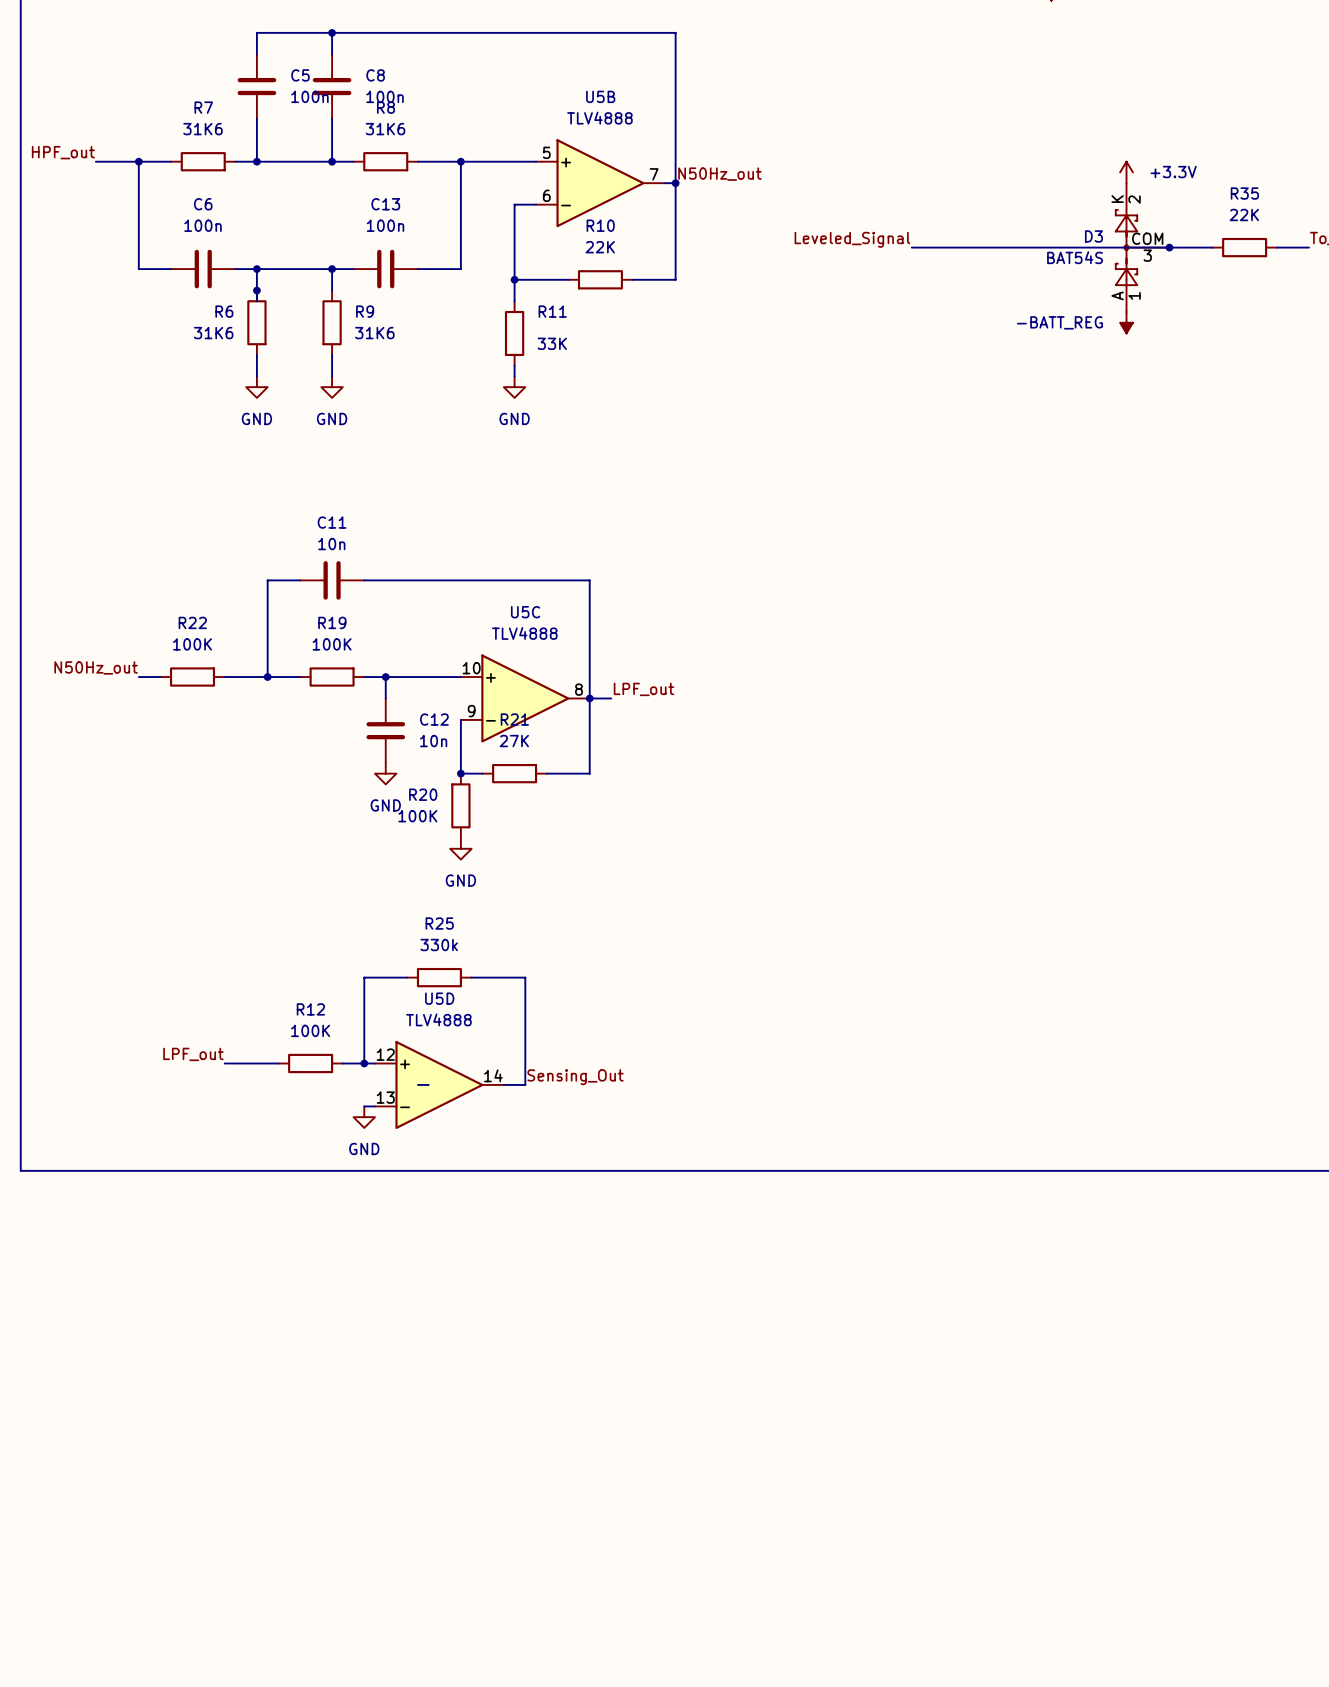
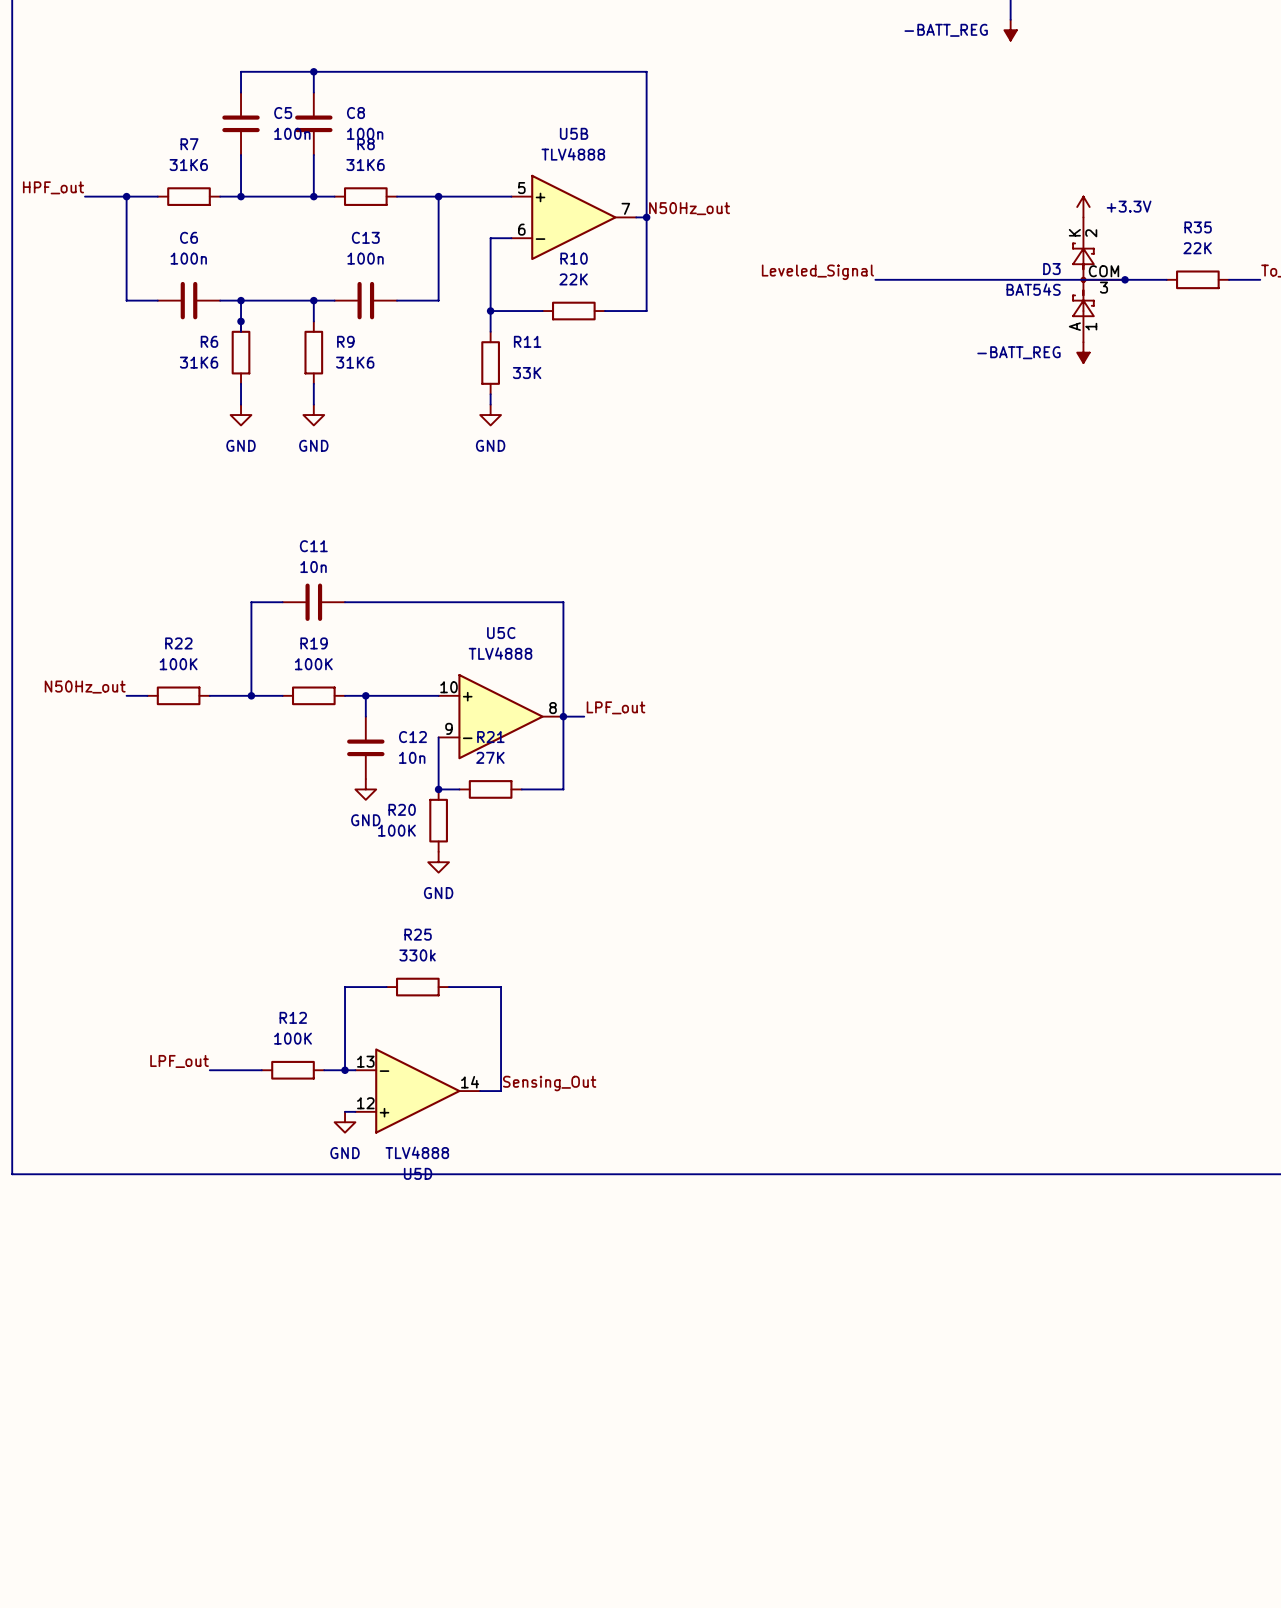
U5D flip: as is (439, 1084) -> up-down (417, 1091)

